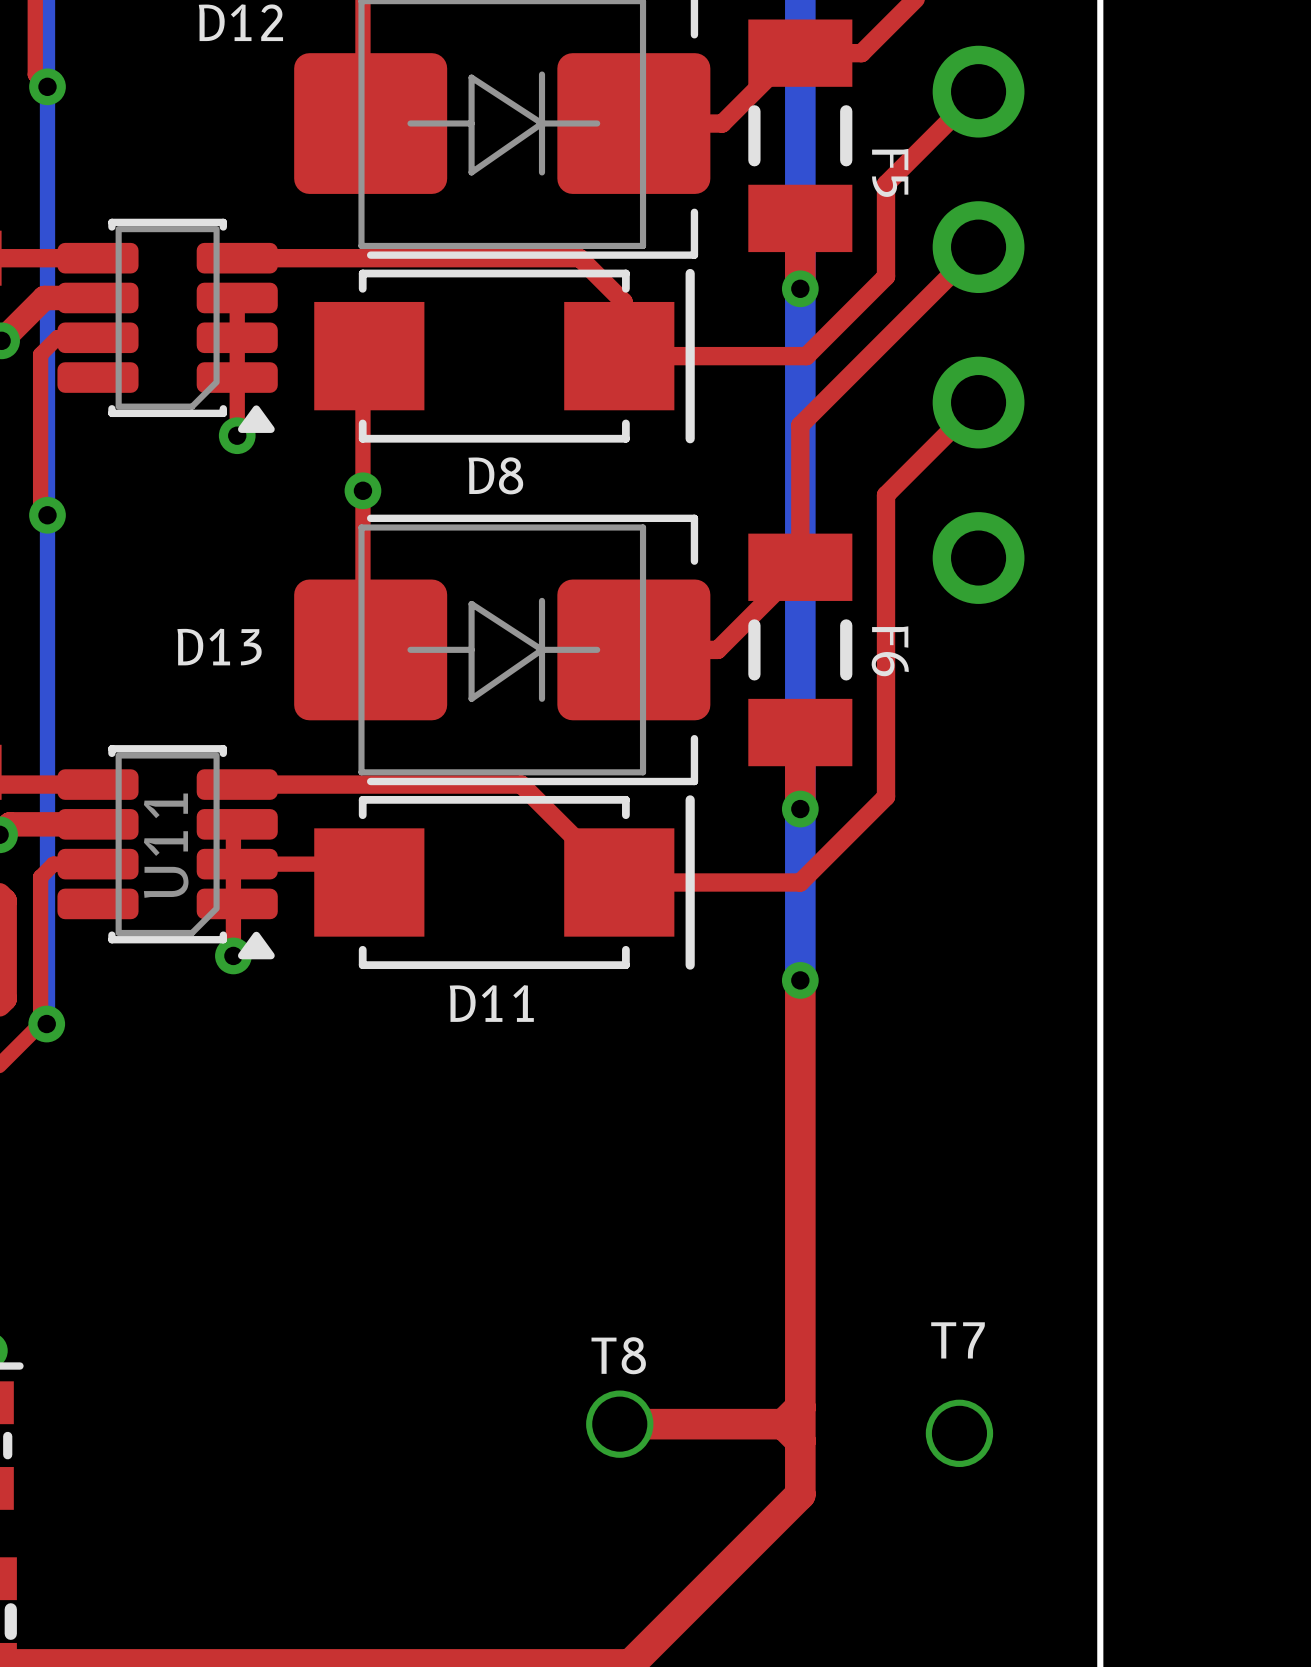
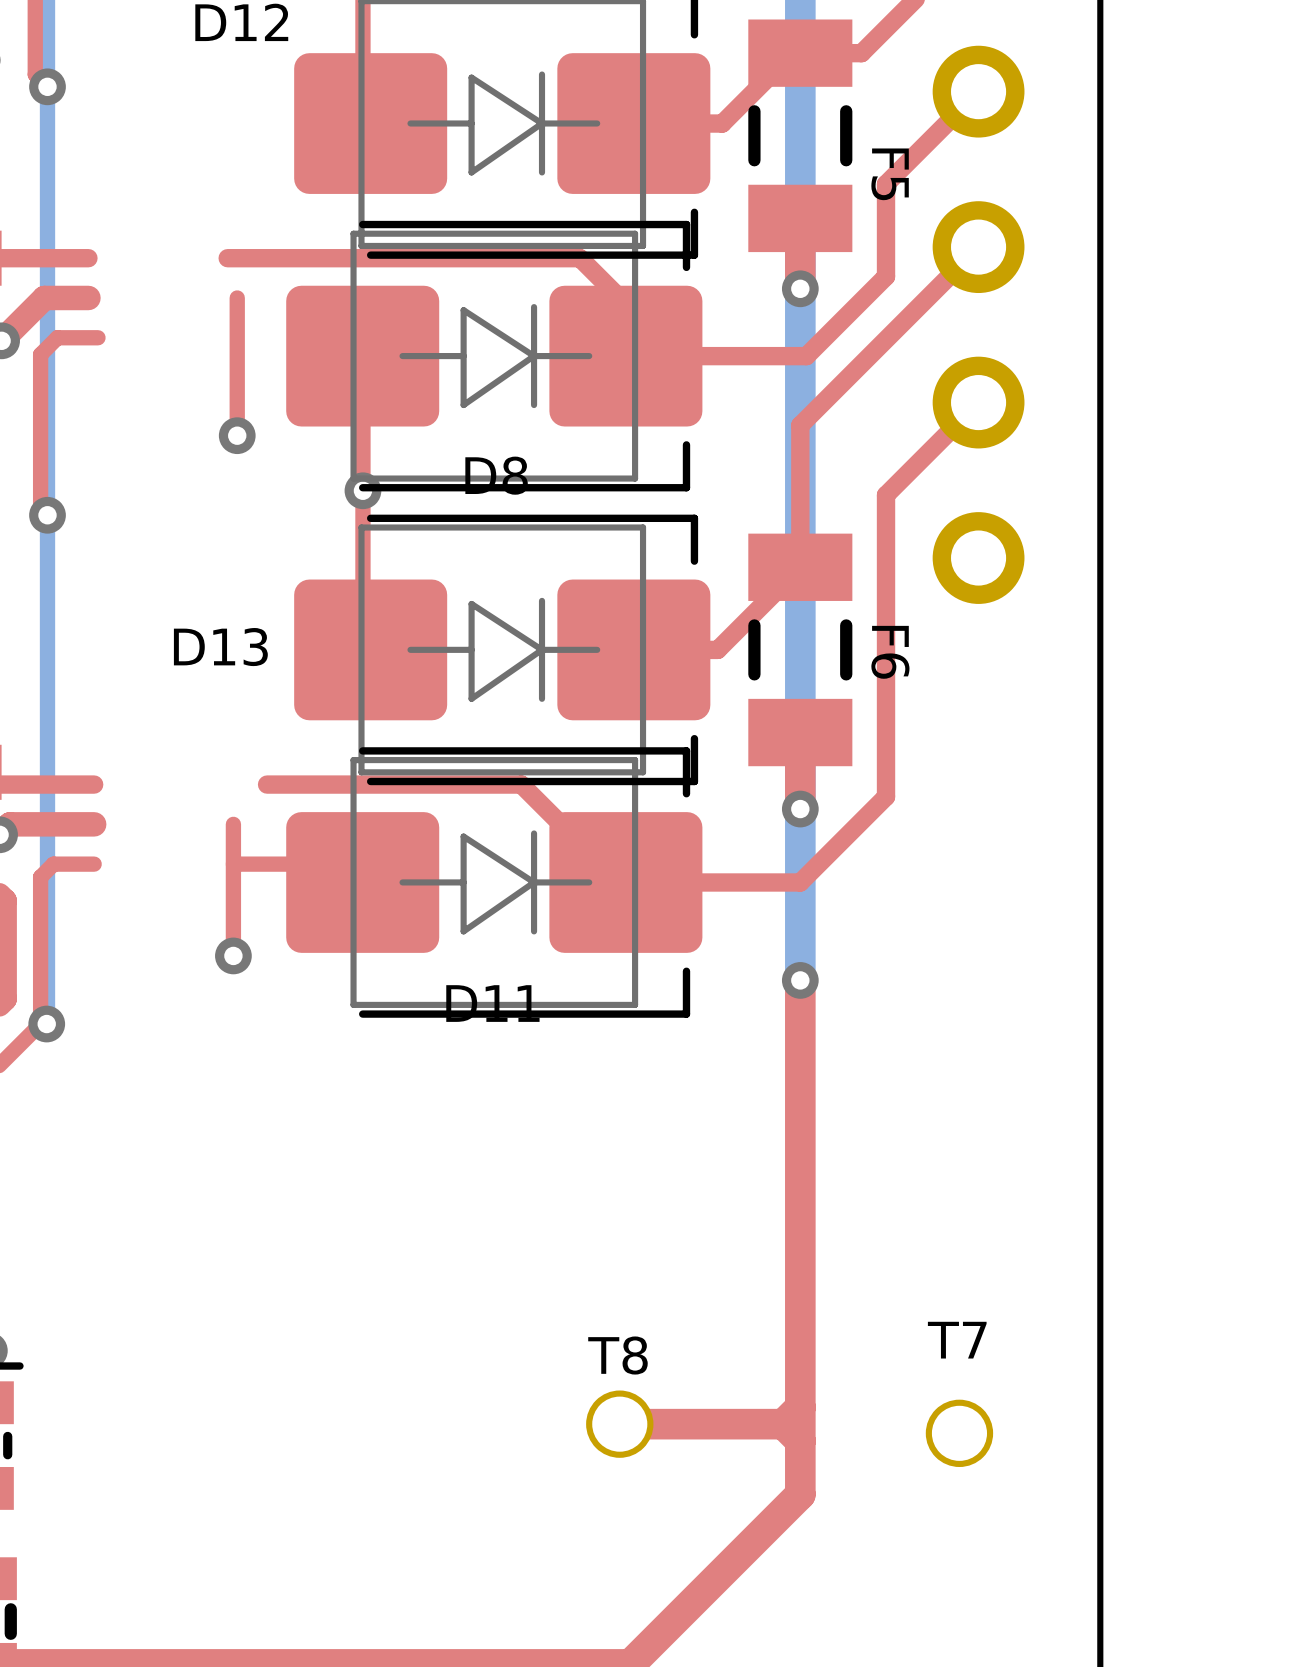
D8 footprint: [314, 268, 695, 444] -> [286, 220, 703, 492]
part: (167, 325) -> none
D11 footprint: [314, 795, 695, 970] -> [286, 747, 703, 1018]
U11: (167, 852) -> none

